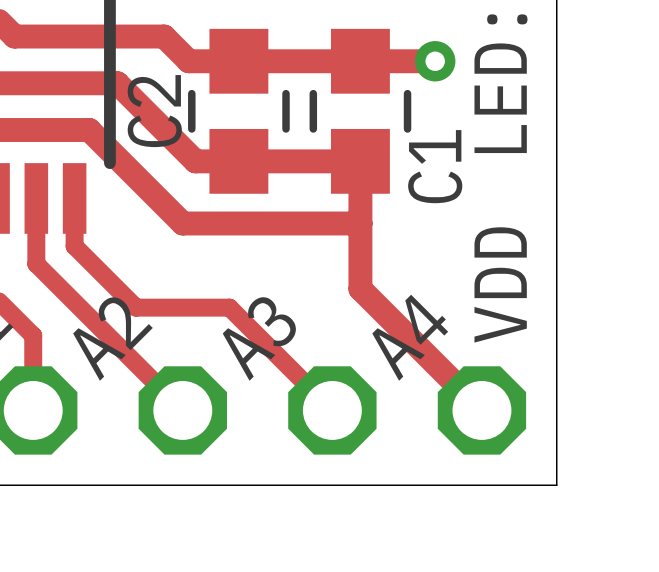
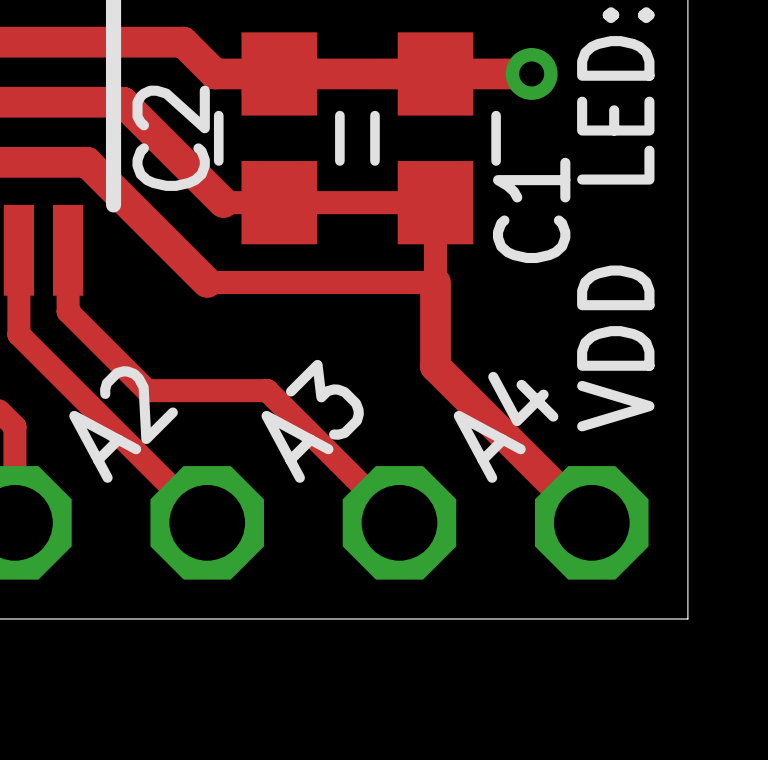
top track width: thick (195, 161) (360, 161) (360, 223) (182, 223) -> thin (223, 202) (435, 202) (435, 282) (207, 282)

